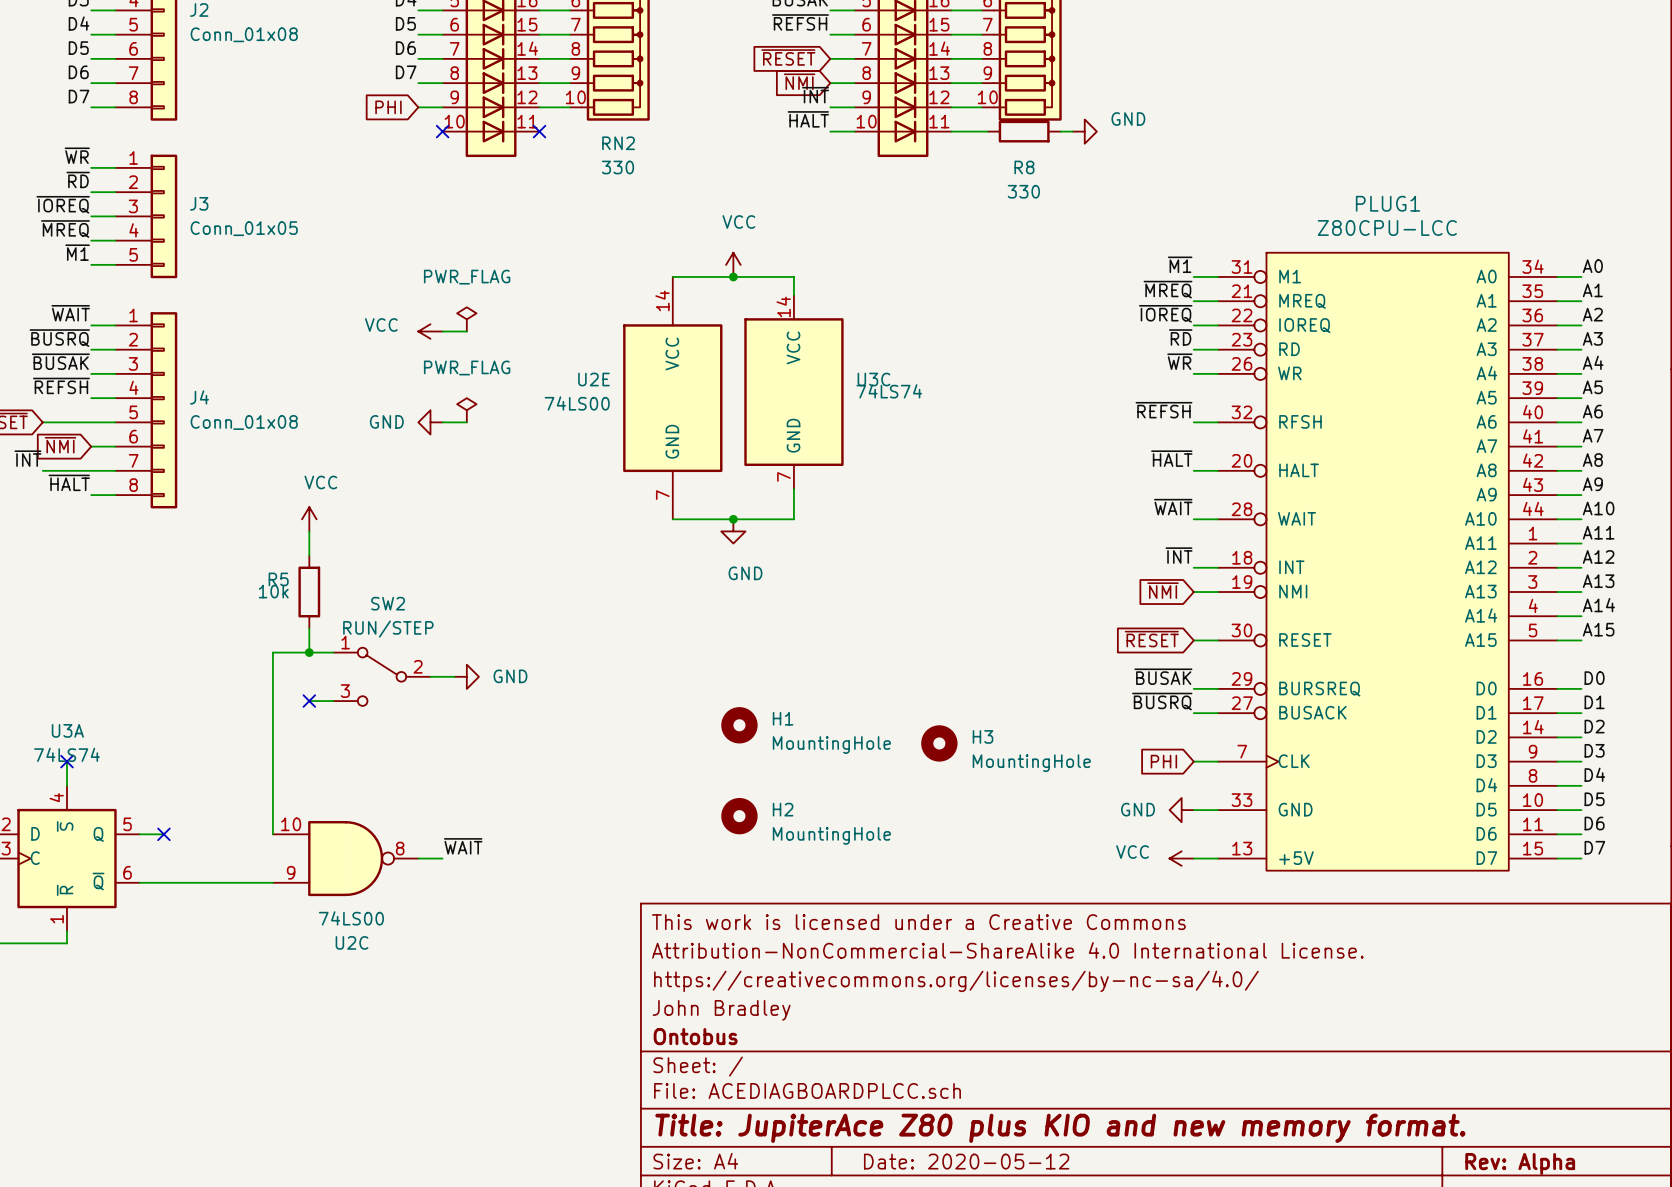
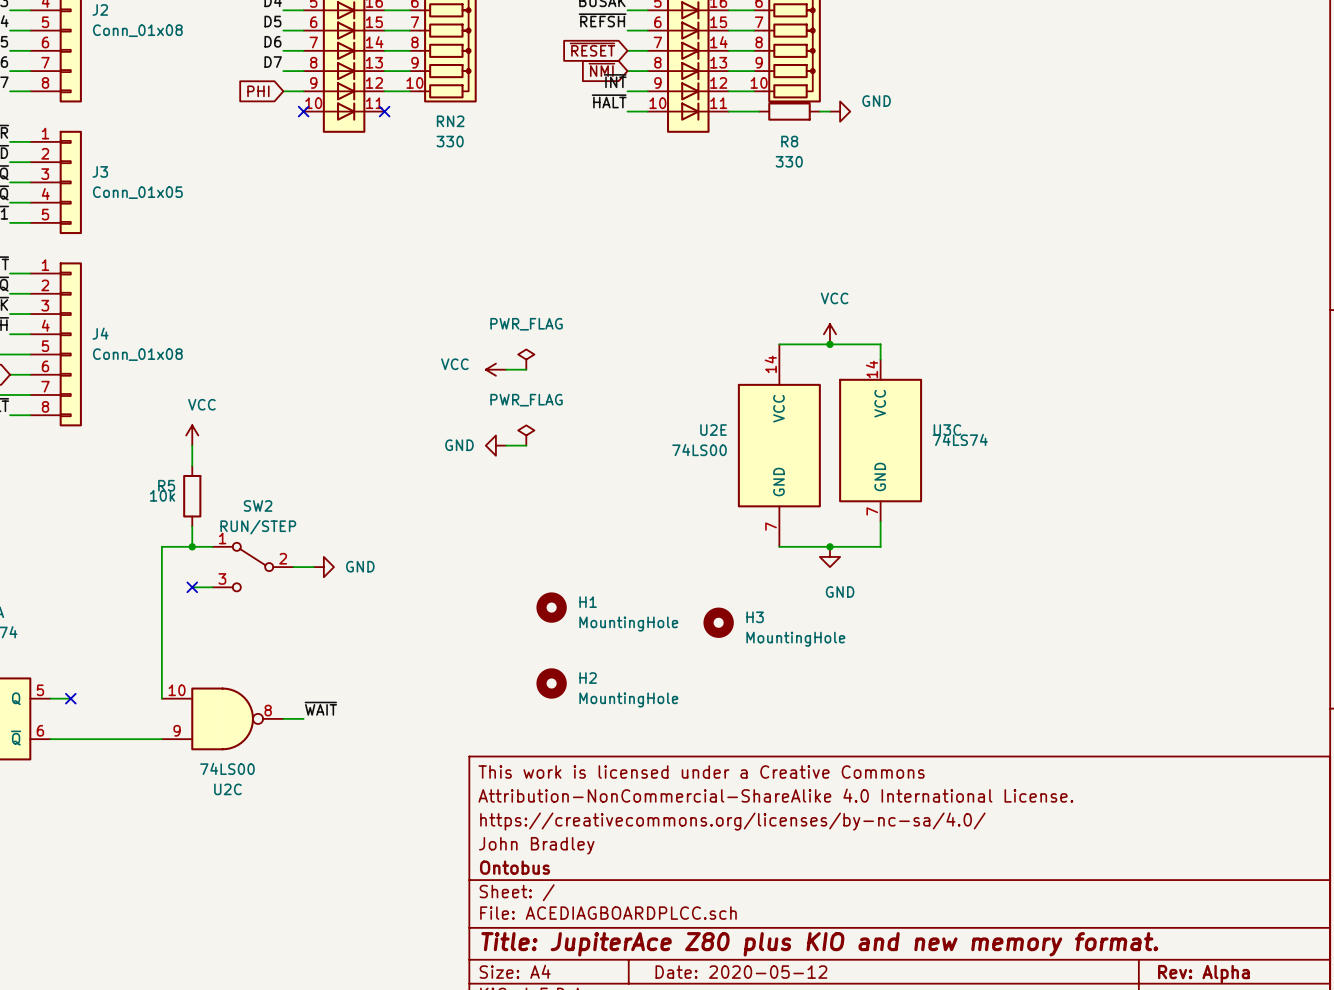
power symbol: VCC (733, 264) -> none
label: ~{M1} (1180, 264) -> none
label: A0 (1592, 266) -> none
wire: (672, 276) (793, 276) (793, 295) -> none
junction: (733, 276) -> none
wire: (1193, 276) (1218, 276) -> none
wire: (1557, 276) (1581, 276) -> none
label: ~{MREQ} (1168, 289) -> none
label: A1 (1592, 290) -> none
wire: (1193, 301) (1218, 301) -> none
wire: (1557, 301) (1581, 301) -> none
label: ~{IOREQ} (1165, 313) -> none
label: A2 (1592, 314) -> none
power symbol: PWR_FLAG (466, 319) -> none
wire: (1193, 325) (1218, 325) -> none
wire: (1557, 325) (1581, 325) -> none
power symbol: VCC (430, 331) -> none
wire: (442, 331) (466, 331) -> none
label: ~{RD} (1180, 337) -> none
label: A3 (1592, 338) -> none
wire: (1193, 349) (1218, 349) -> none
wire: (1557, 349) (1581, 349) -> none
label: ~{WR} (1179, 361) -> none
label: A4 (1593, 362) -> none
wire: (1193, 373) (1218, 373) -> none
wire: (1557, 373) (1581, 373) -> none
label: A5 (1592, 387) -> none
U3C position: (793, 392) -> (880, 440)
U2E position: (672, 398) -> (779, 445)
power symbol: none -> VCC (829, 334)
wire: (1557, 398) (1581, 398) -> none
power symbol: PWR_FLAG (466, 410) -> none
wire: none -> (779, 344) (880, 344) (880, 359)
junction: none -> (829, 344)
label: ~{REFSH} (1163, 410) -> none
label: A6 (1592, 411) -> none
power symbol: GND (430, 422) -> none
wire: (442, 422) (466, 422) -> none
wire: (1193, 422) (1218, 422) -> none
wire: (1557, 422) (1581, 422) -> none
power symbol: none -> PWR_FLAG (526, 359)
label: A7 (1593, 435) -> none
power symbol: none -> VCC (495, 369)
wire: (1557, 446) (1581, 446) -> none
label: ~{HALT} (1171, 458) -> none
label: A8 (1592, 460) -> none
wire: (1193, 470) (1218, 470) -> none
wire: (1557, 470) (1581, 470) -> none
label: A9 (1592, 484) -> none
wire: (793, 489) (793, 519) (672, 519) -> none
wire: (1557, 495) (1581, 495) -> none
label: ~{WAIT} (1173, 507) -> none
label: A10 (1598, 508) -> none
power symbol: none -> PWR_FLAG (526, 435)
junction: (733, 519) -> none
wire: (1557, 519) (1581, 519) -> none
wire: none -> (506, 445) (526, 445)
power symbol rotation: 0° (733, 531) -> 90° clockwise (495, 445)
power symbol position: GND (733, 531) -> GND (495, 445)
label: A11 (1598, 532) -> none
wire: (1557, 543) (1581, 543) -> none
label: ~{INT} (1179, 555) -> none
label: A12 (1598, 556) -> none
PLUG1: Z80CPU-LCC (1387, 561) -> none
wire: (1193, 567) (1218, 567) -> none
wire: (1557, 567) (1581, 567) -> none
label: A13 (1598, 581) -> none
global label: ~{NMI} (1163, 590) -> none
wire: (1193, 592) (1218, 592) -> none
wire: (1557, 592) (1581, 592) -> none
label: A14 (1598, 605) -> none
wire: (1557, 616) (1581, 616) -> none
wire: none -> (880, 521) (880, 546) (779, 546)
label: A15 (1598, 629) -> none
global label: ~{RESET} (1151, 639) -> none
wire: (1193, 640) (1218, 640) -> none
wire: (1557, 640) (1581, 640) -> none
junction: none -> (829, 546)
label: ~{BUSAK} (1163, 676) -> none
label: D0 (1594, 678) -> none
wire: (1193, 688) (1218, 688) -> none
wire: (1557, 688) (1581, 688) -> none
label: ~{BUSRQ} (1162, 701) -> none
label: D1 (1594, 702) -> none
wire: (1193, 713) (1218, 713) -> none
wire: (1557, 713) (1581, 713) -> none
label: D2 (1594, 726) -> none
wire: (1557, 737) (1581, 737) -> none
label: D3 (1594, 750) -> none
global label: PHI (1163, 761) -> none
wire: (1193, 761) (1218, 761) -> none
wire: (1557, 761) (1581, 761) -> none
label: D4 (1594, 774) -> none
wire: (1557, 785) (1581, 785) -> none
label: D5 (1594, 799) -> none
power symbol rotation: 0° (1181, 810) -> 90° counterclockwise (829, 556)
power symbol position: GND (1181, 810) -> GND (829, 556)
wire: (1193, 810) (1218, 810) -> none
wire: (1557, 810) (1581, 810) -> none
label: D6 (1594, 823) -> none
wire: (1557, 834) (1581, 834) -> none
label: D7 (1594, 847) -> none
power symbol: VCC (1181, 858) -> none
wire: (1193, 858) (1218, 858) -> none
wire: (1557, 858) (1581, 858) -> none

